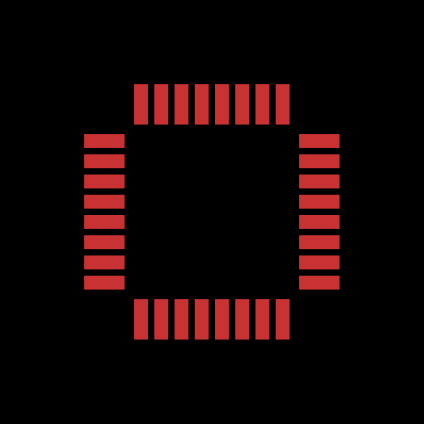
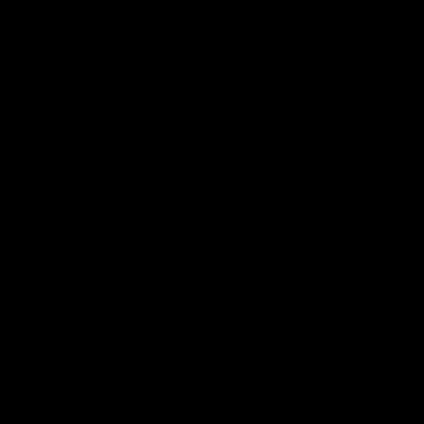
part: (211, 211) -> none

